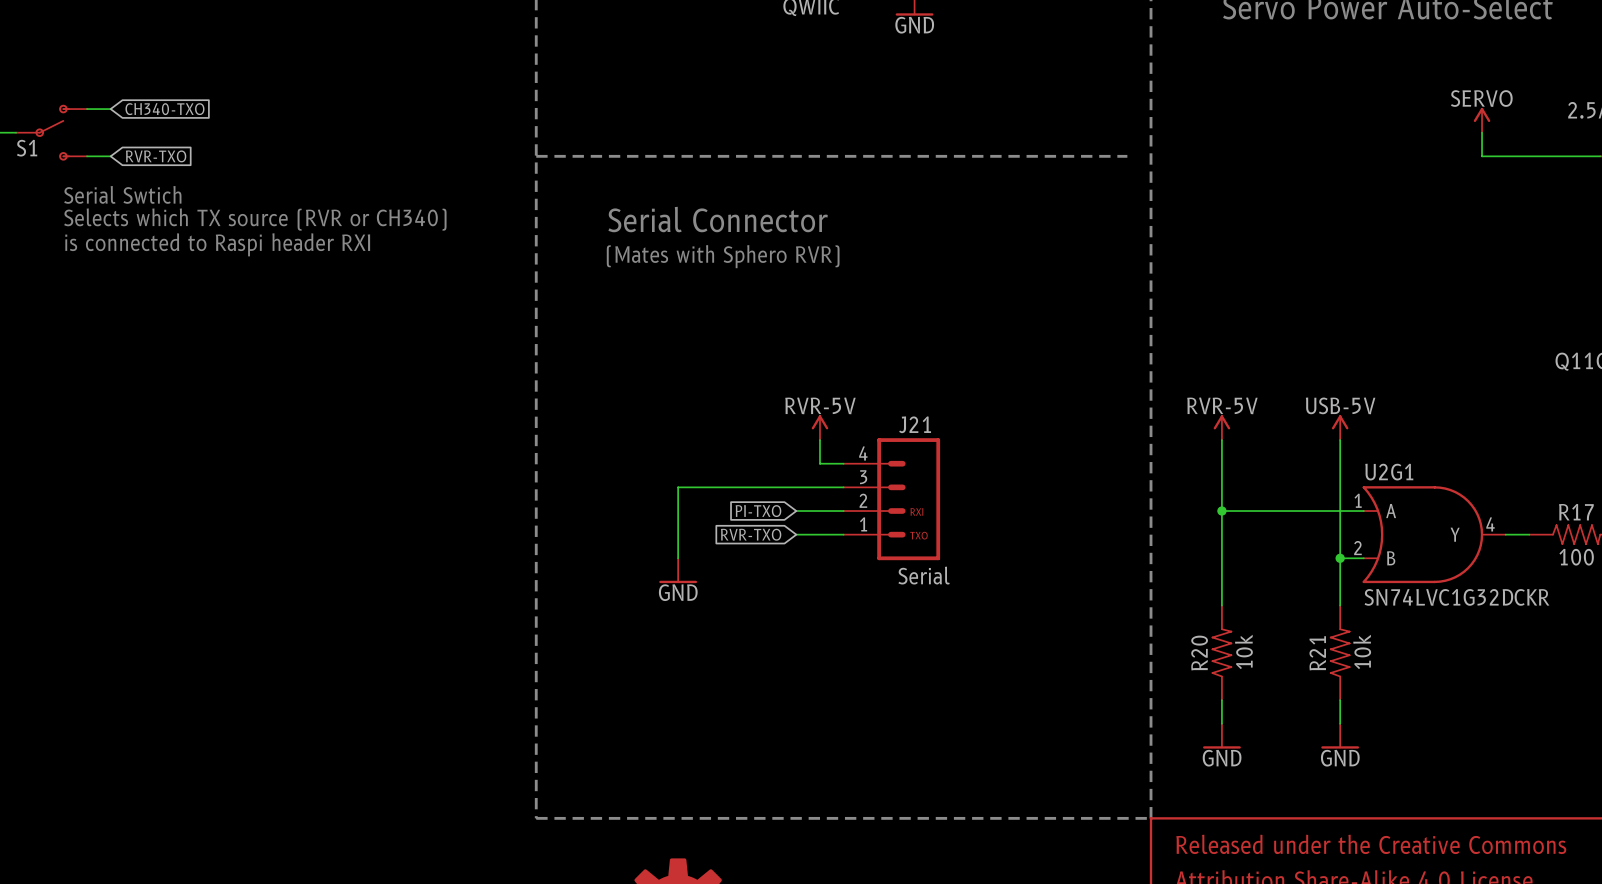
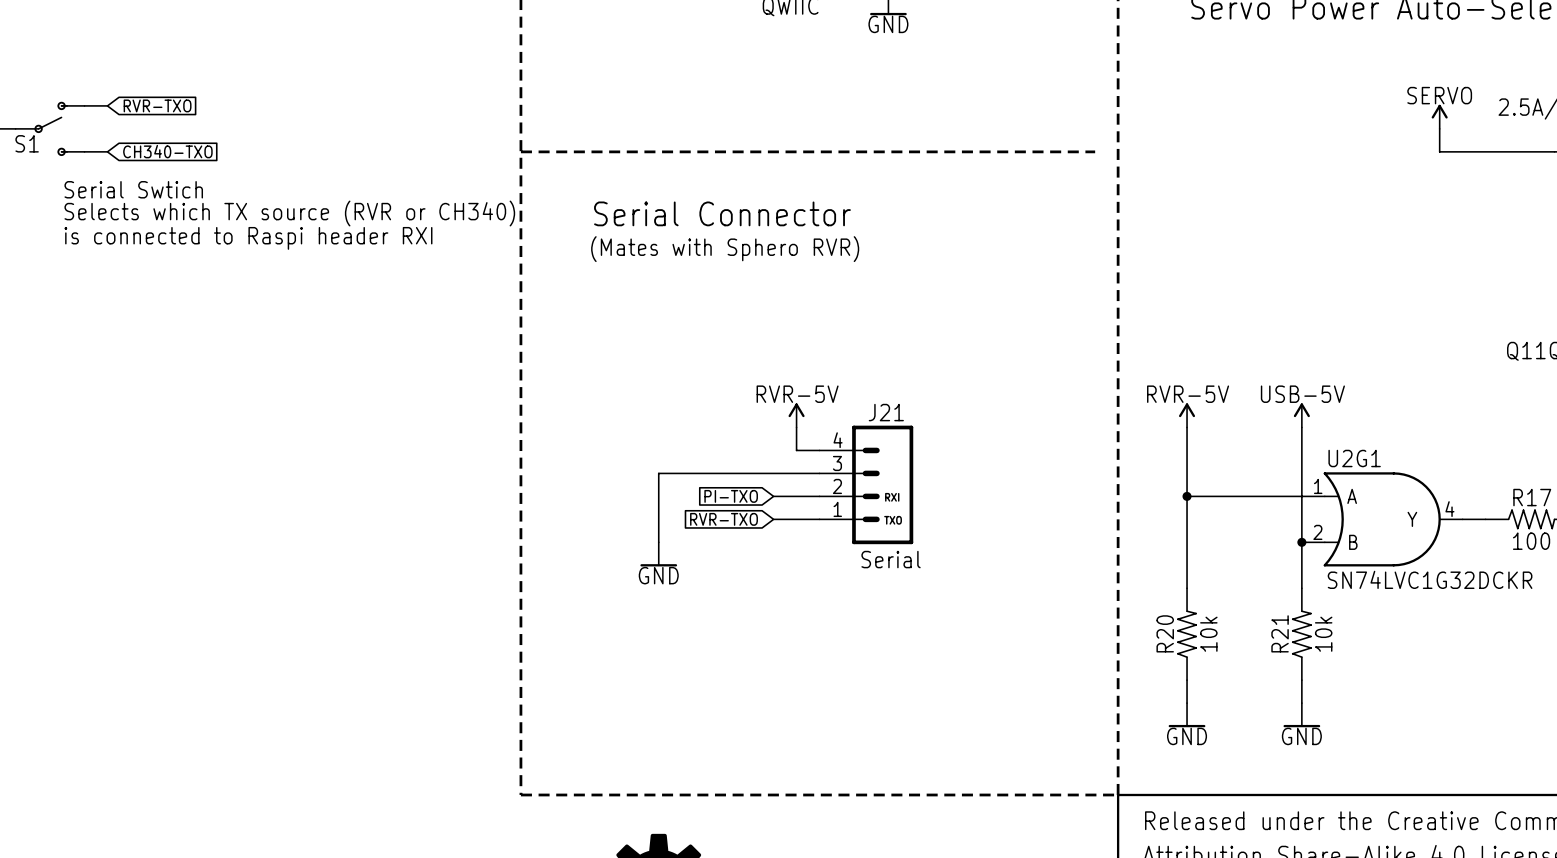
global label: CH340-TXO (164, 109) -> RVR-TXO (157, 105)
global label: RVR-TXO (156, 156) -> CH340-TXO (167, 151)

